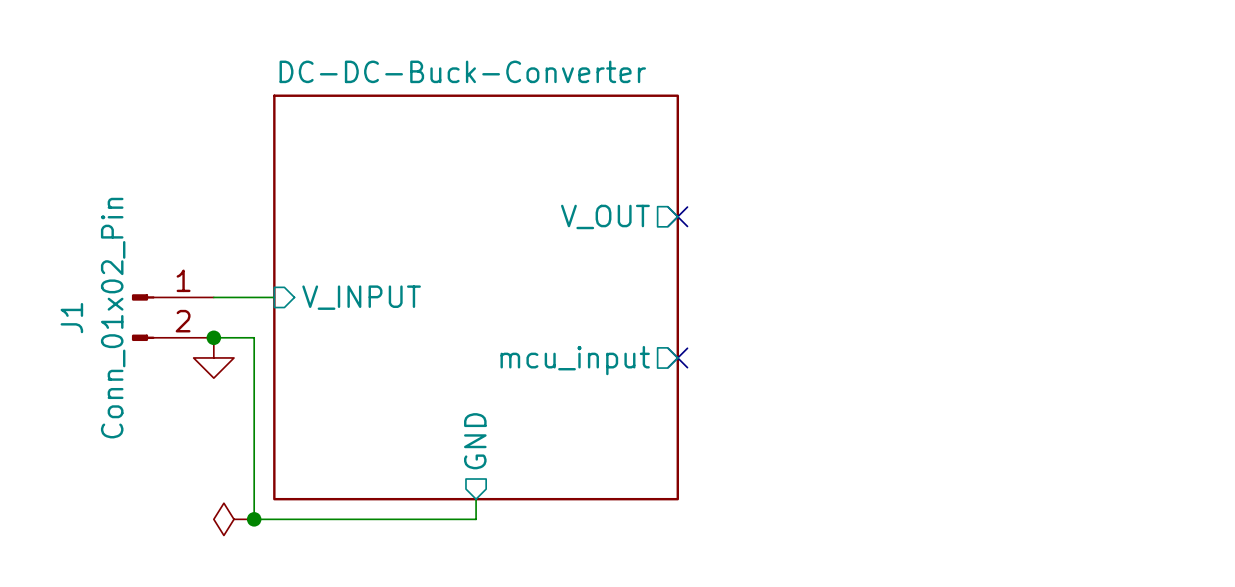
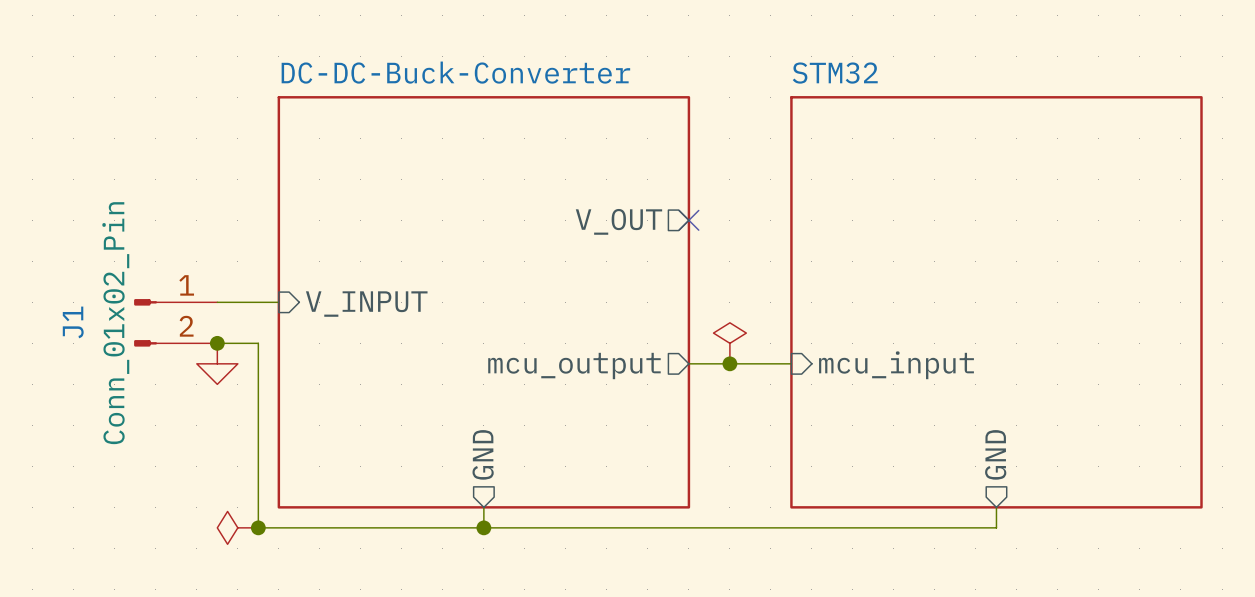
sheet STM32: none -> (996, 302)
power symbol: none -> (729, 343)
wire: none -> (688, 363) (791, 363)
no-connect mark: (677, 357) -> none
junction: none -> (729, 363)
sheet pin: mcu_input (575, 360) -> mcu_output (574, 366)
sheet pin: none -> mcu_input (896, 365)
sheet pin: none -> GND (995, 454)
wire: none -> (996, 507) (996, 527) (483, 527)
junction: none -> (483, 527)

